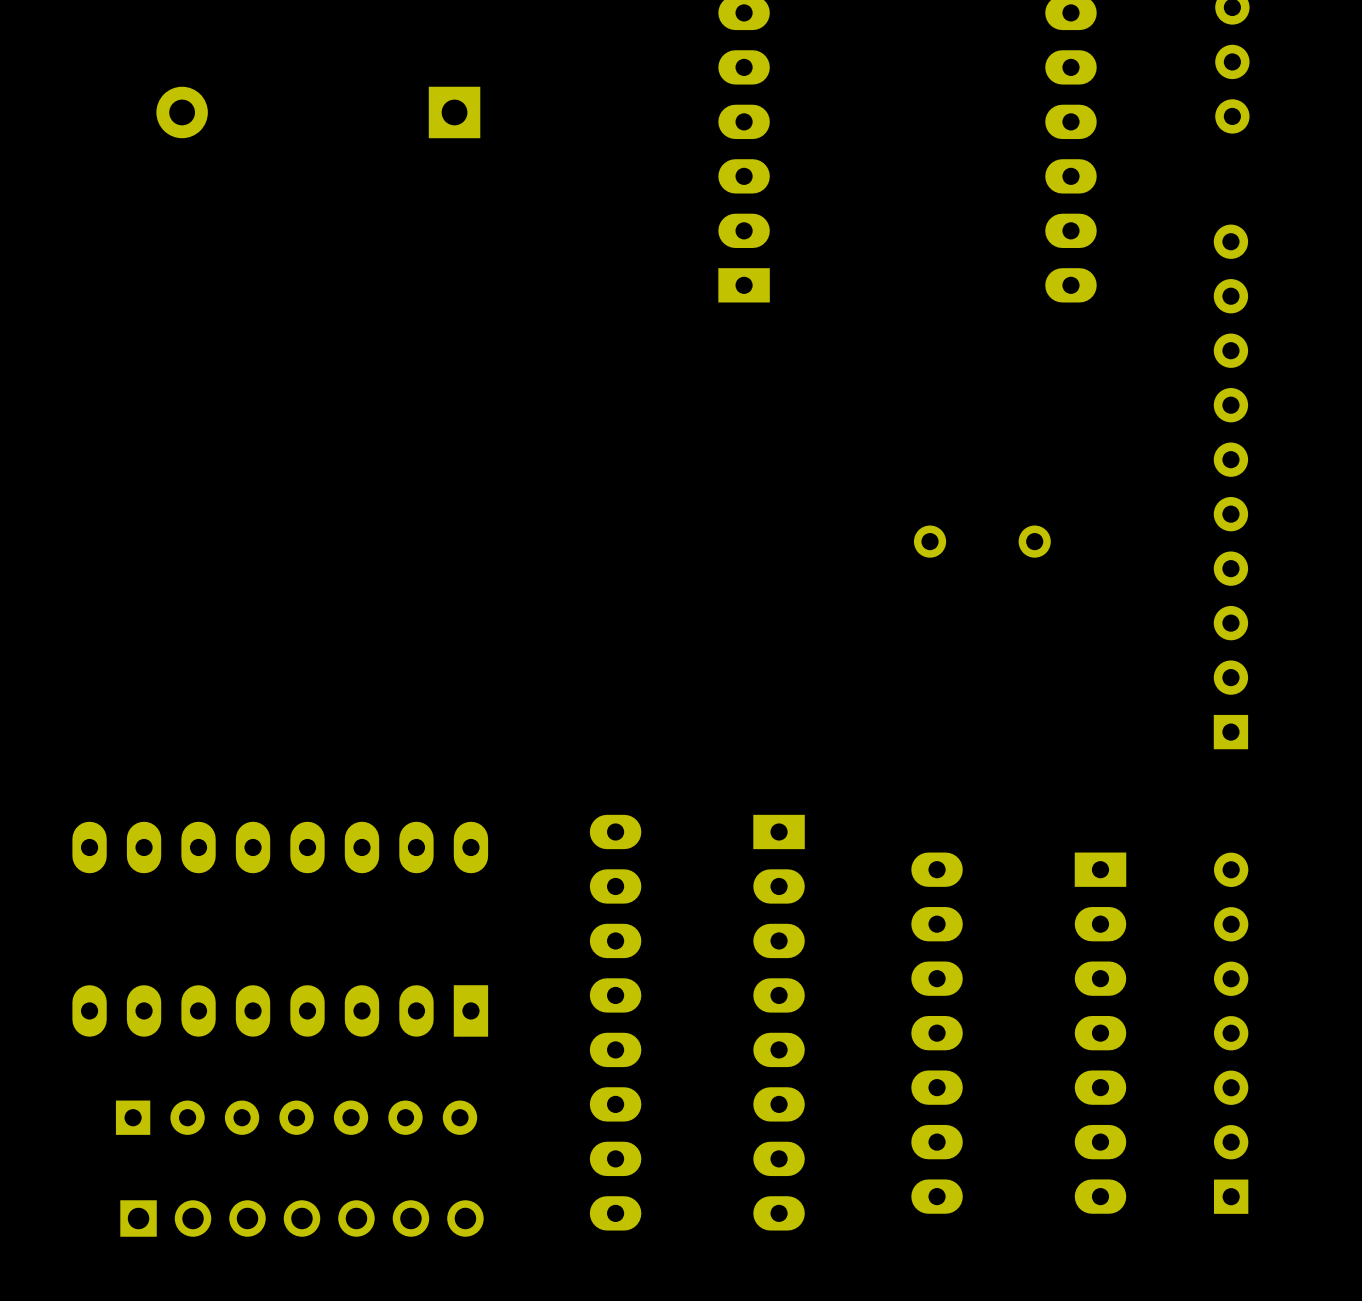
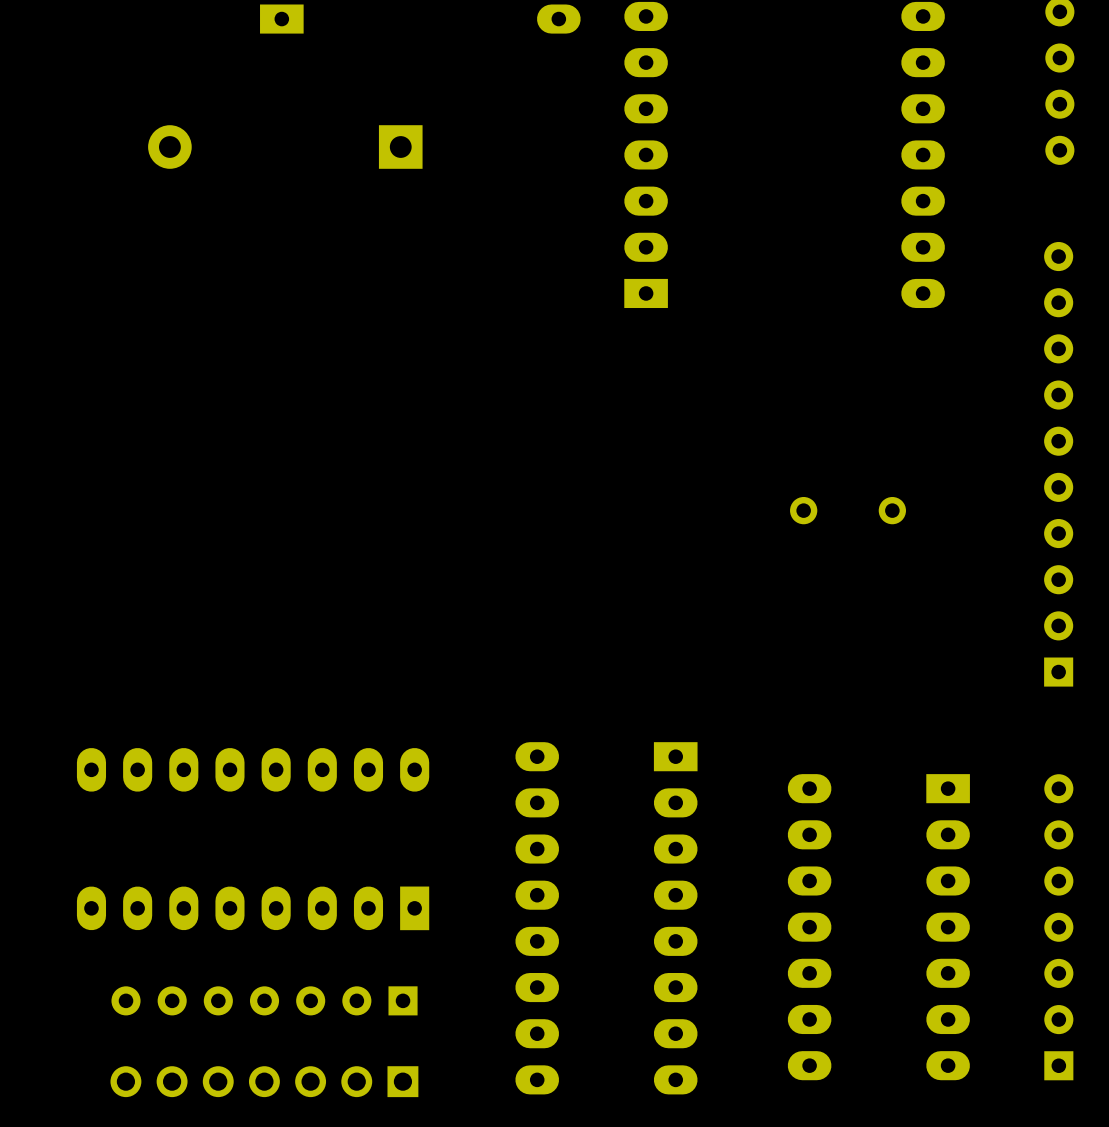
part rotation: 0° (296, 1117) -> 180° (264, 1000)
part rotation: 0° (301, 1218) -> 180° (264, 1081)

